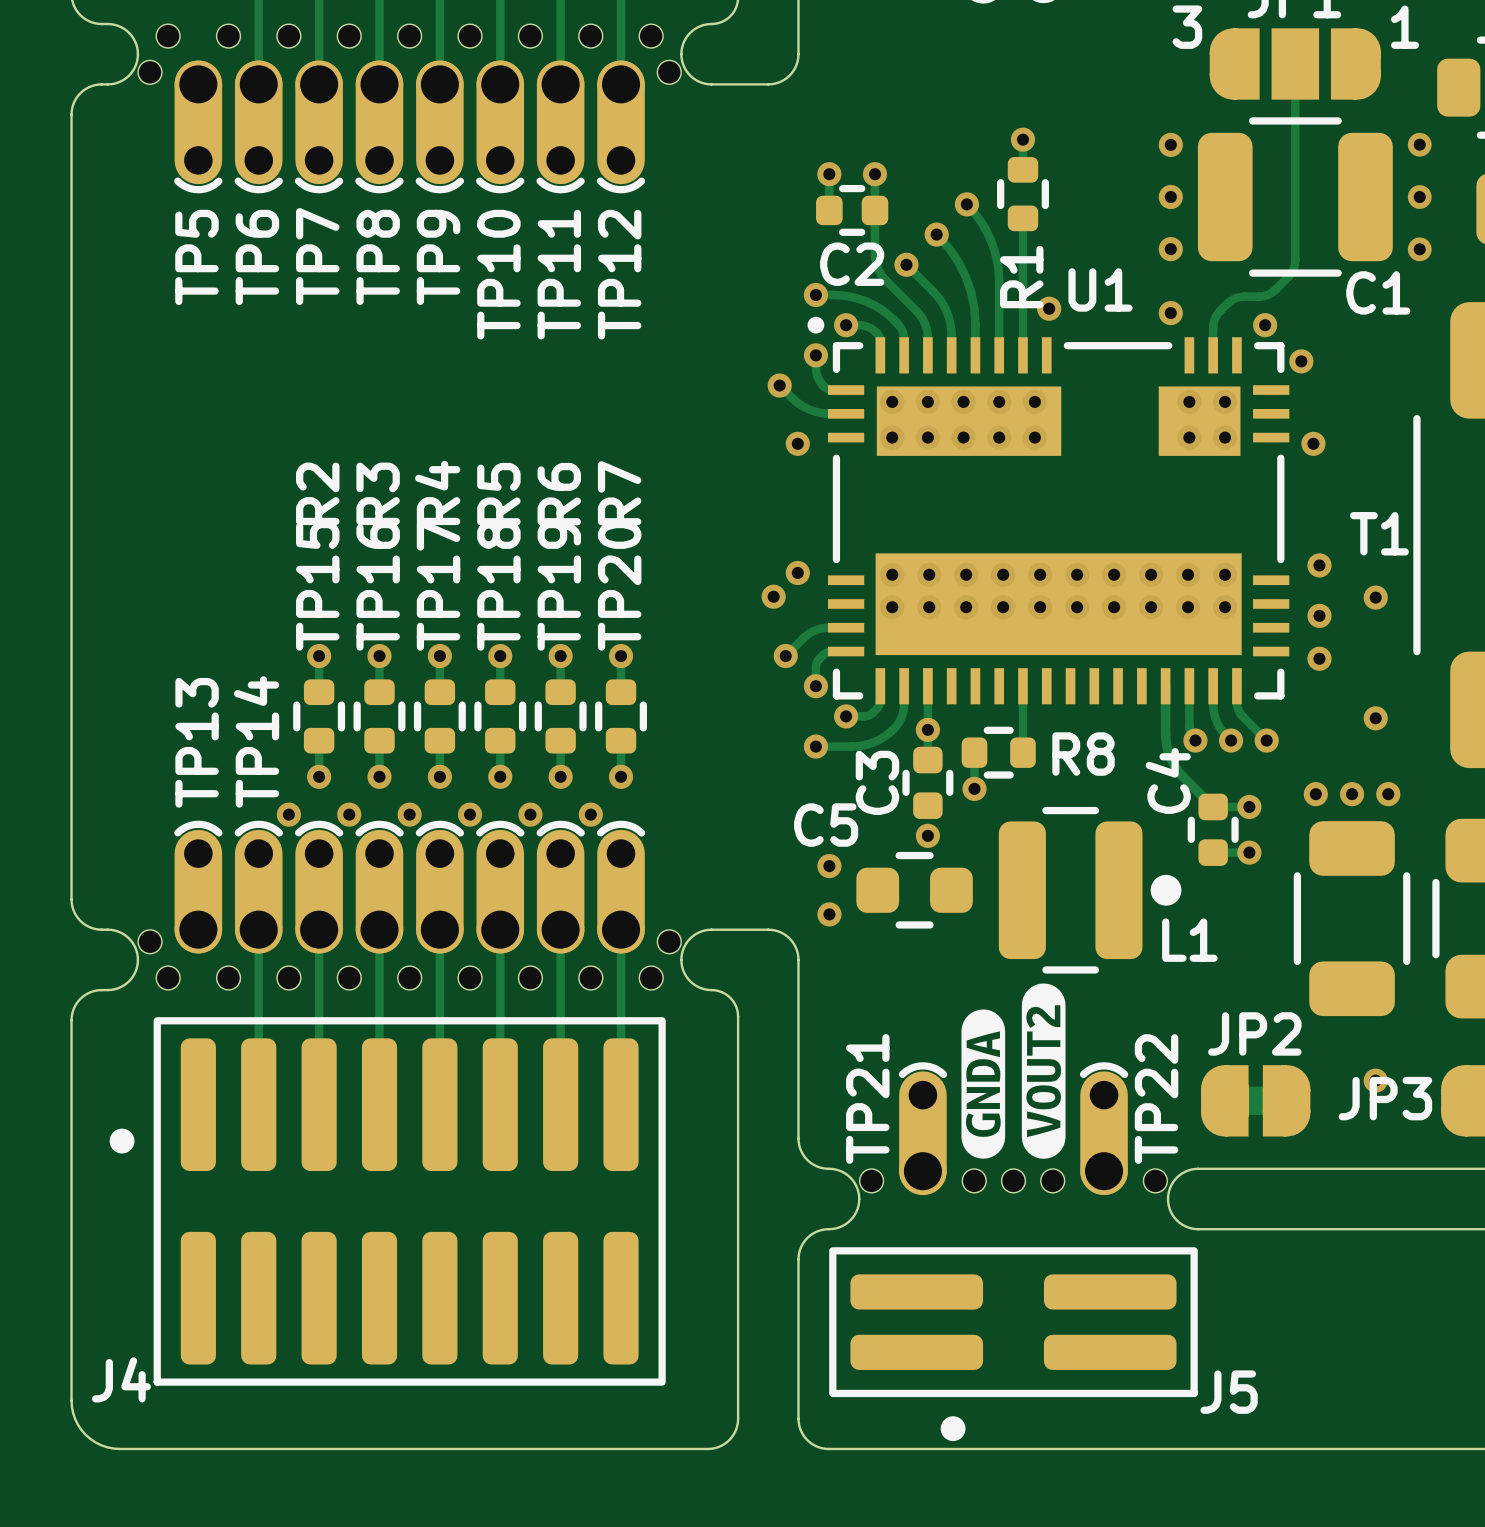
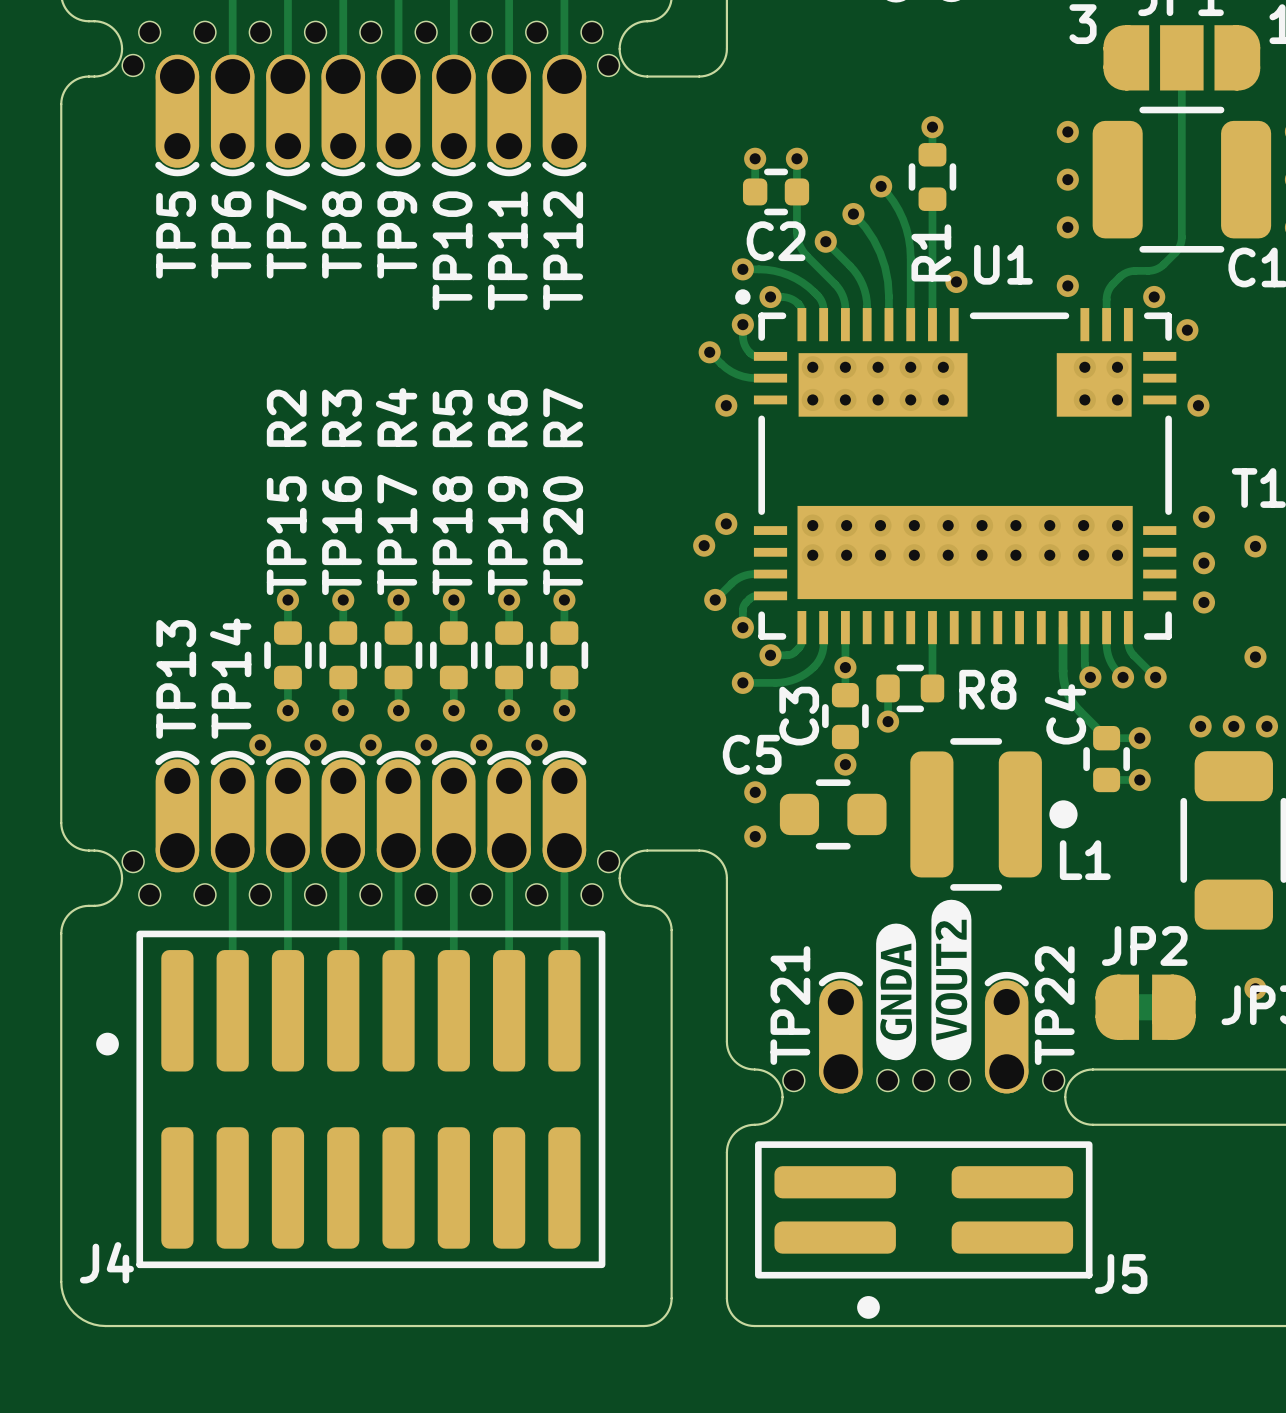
R4 name position: R4 (437, 492) -> R4 (396, 417)
R2 name position: R2 (317, 493) -> R2 (286, 418)
R3 name position: R3 (378, 493) -> R3 (341, 418)
R7 name position: R7 (619, 493) -> R7 (563, 417)
R5 name position: R5 (498, 494) -> R5 (452, 418)
R6 name position: R6 (559, 494) -> R6 (507, 418)

